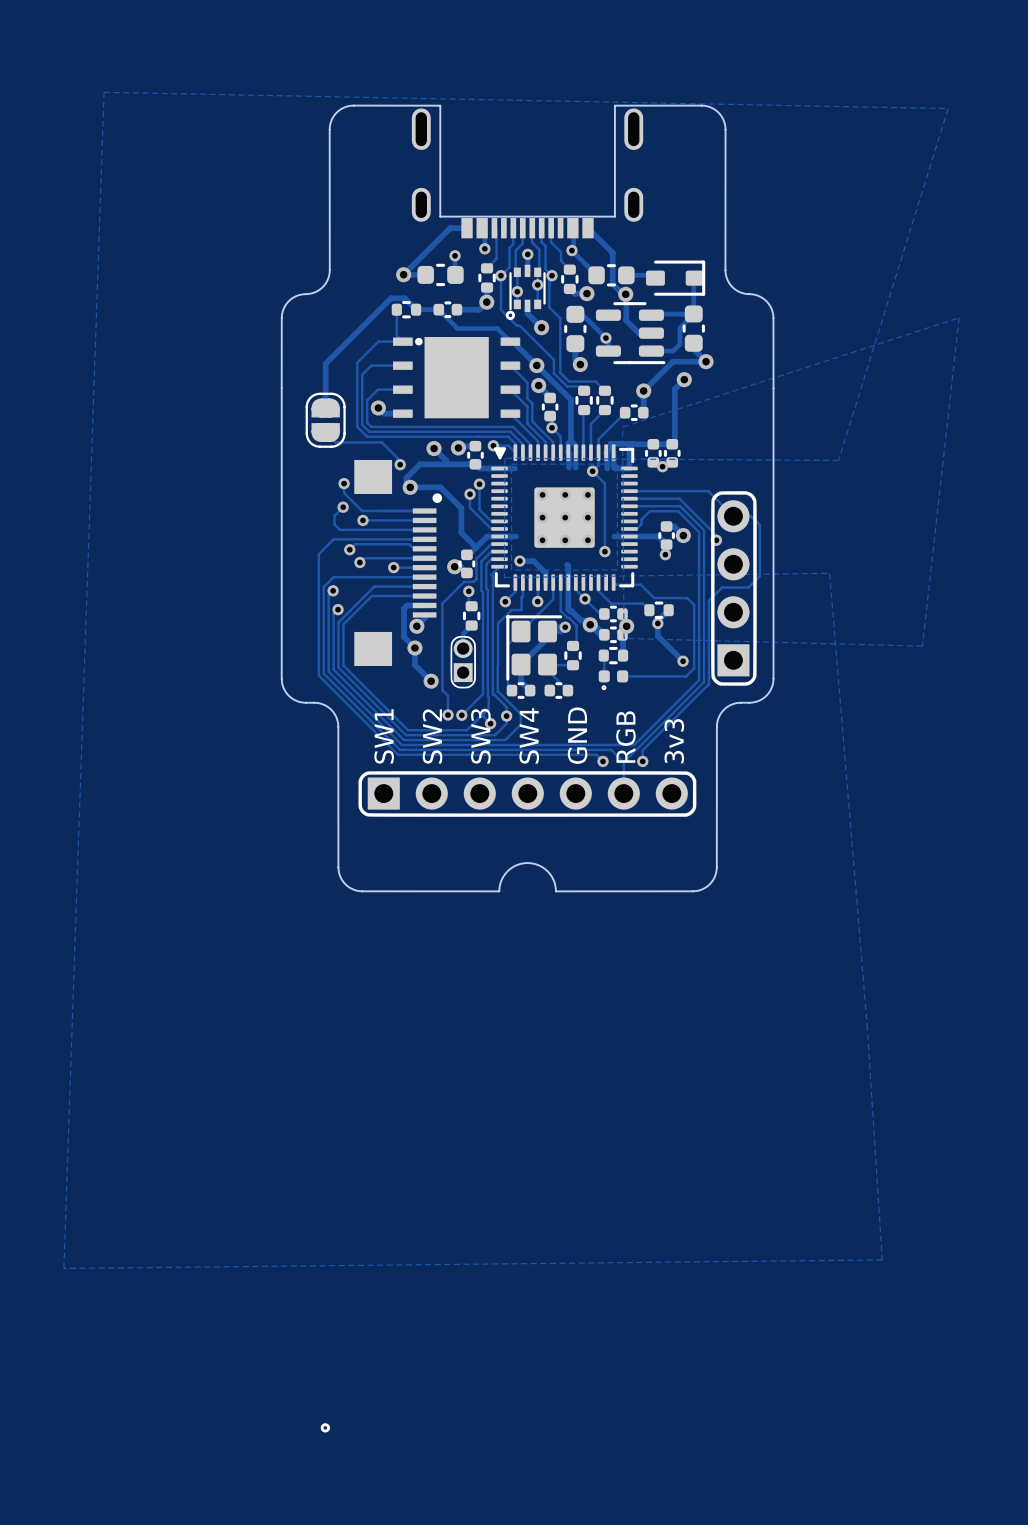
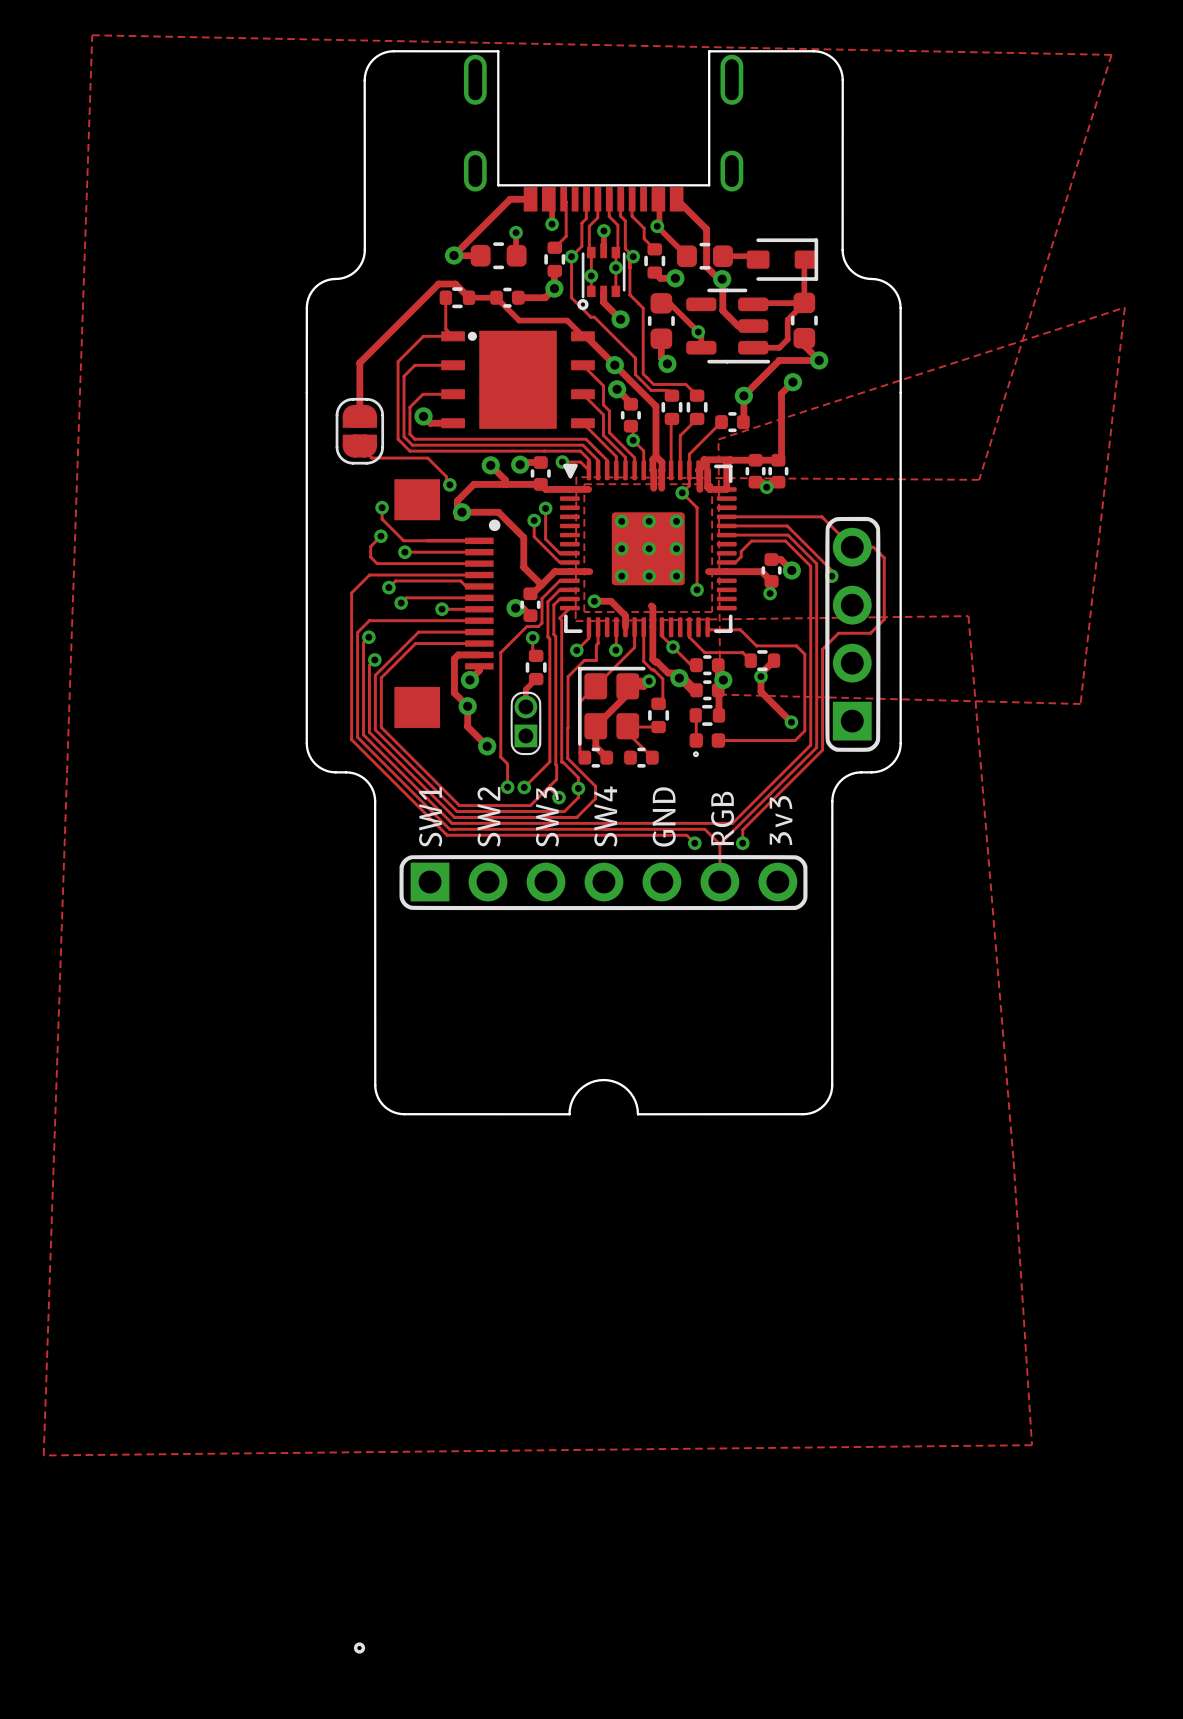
board edge: (338, 726) (338, 867) (339, 875) (345, 884) (352, 888) (362, 891) (499, 891) (501, 880) (507, 871) (516, 865) (527, 863) (538, 865) (547, 871) (553, 880) (555, 891) (692, 891) (707, 886) (714, 877) (716, 870) (716, 726) -> (375, 801) (375, 1085) (379, 1100) (388, 1109) (401, 1114) (569, 1114) (572, 1101) (579, 1090) (590, 1082) (603, 1080) (616, 1082) (627, 1090) (635, 1101) (637, 1114) (806, 1114) (815, 1111) (825, 1103) (830, 1094) (832, 1085) (832, 801)

